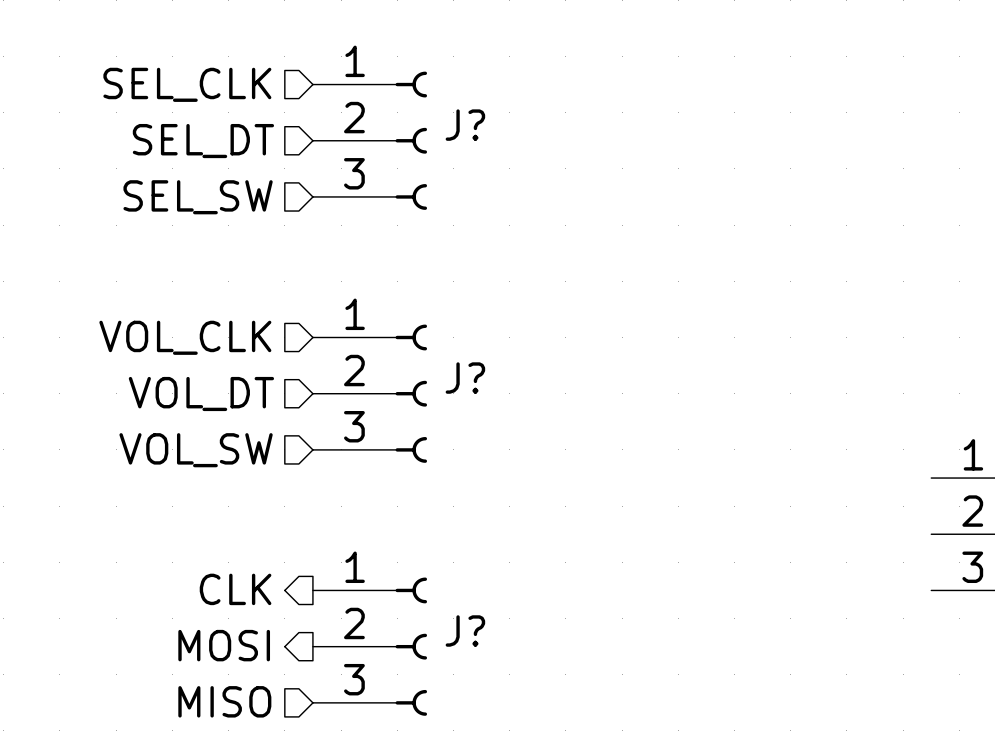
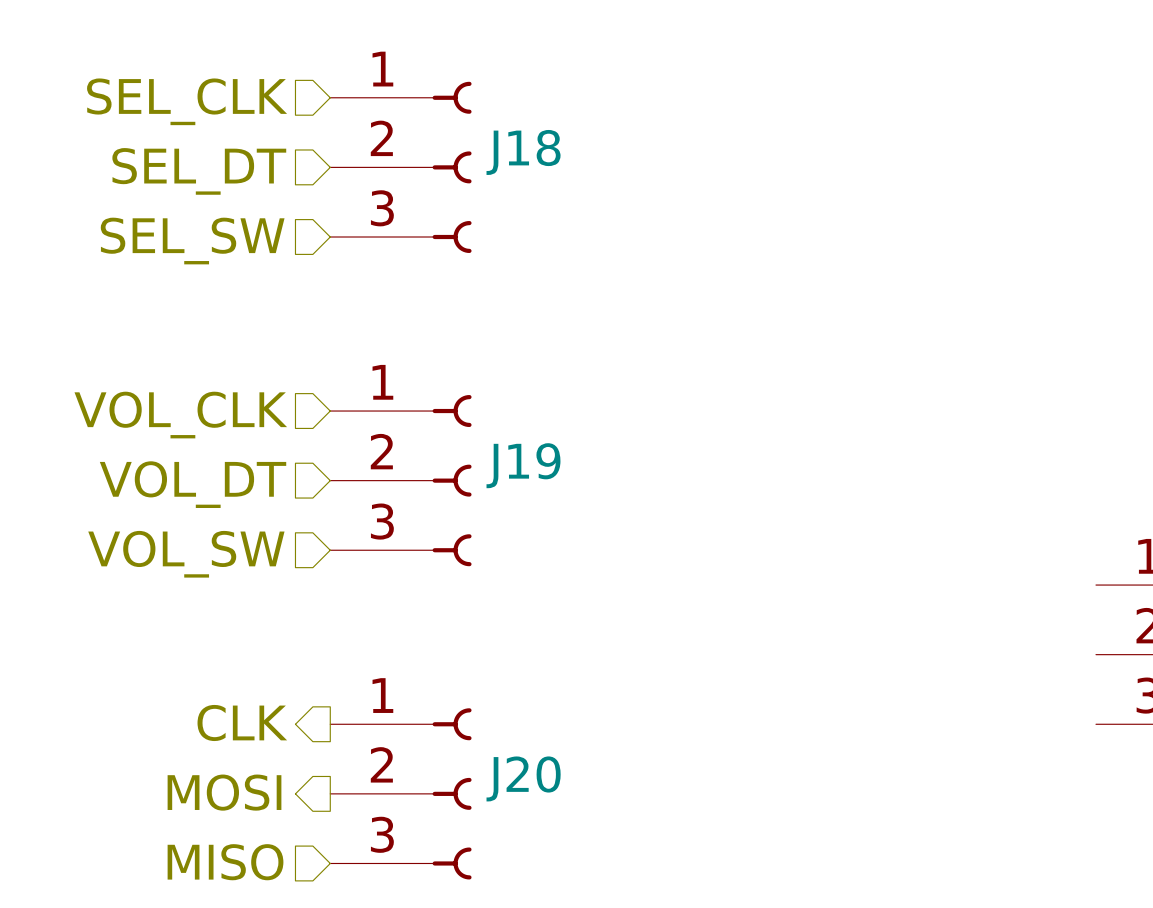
J? name: J? (465, 125) -> J18 (523, 152)
J? name: J? (465, 378) -> J19 (523, 465)
J? name: J? (465, 631) -> J20 (523, 778)

